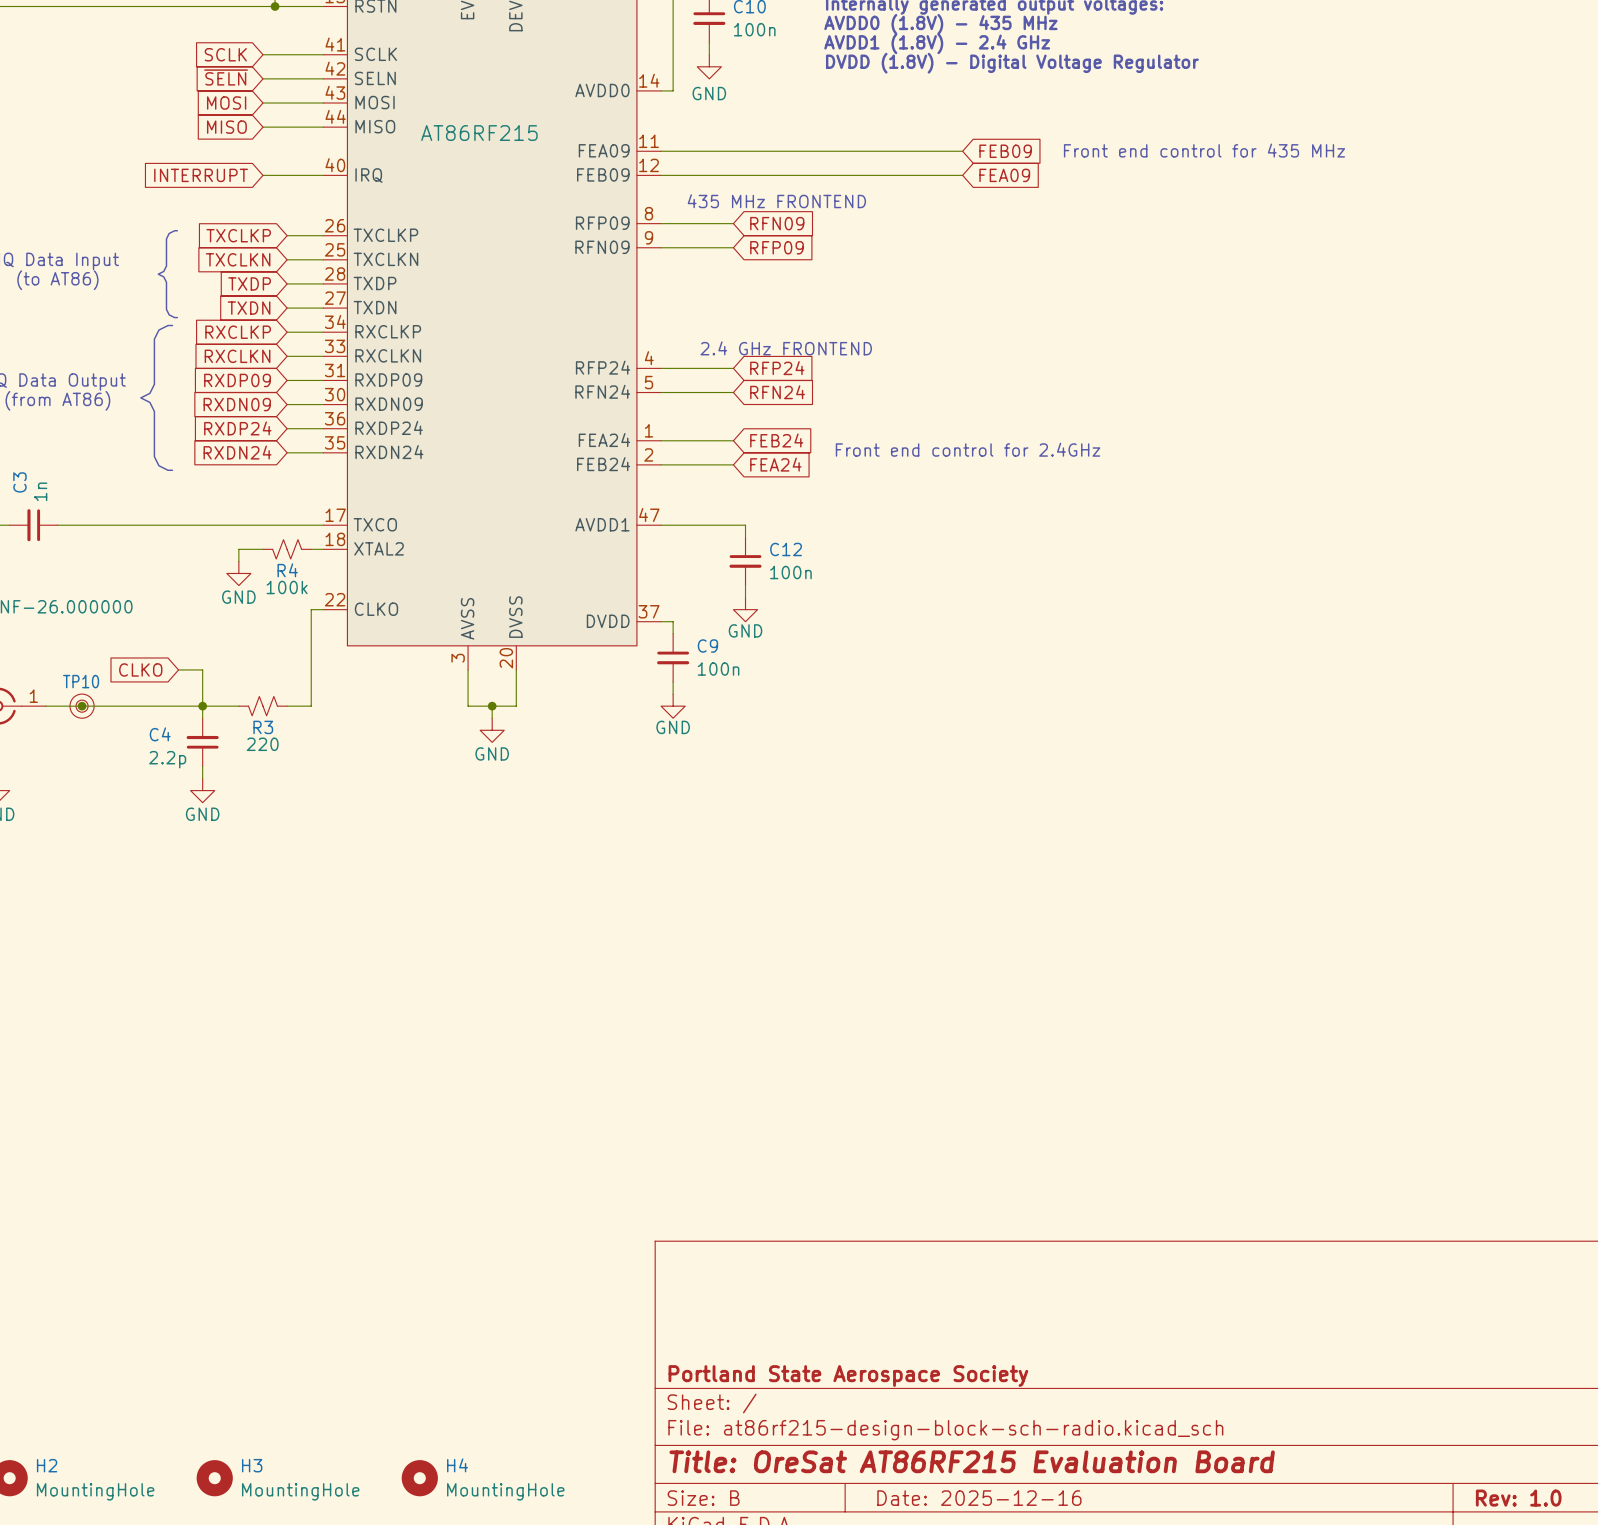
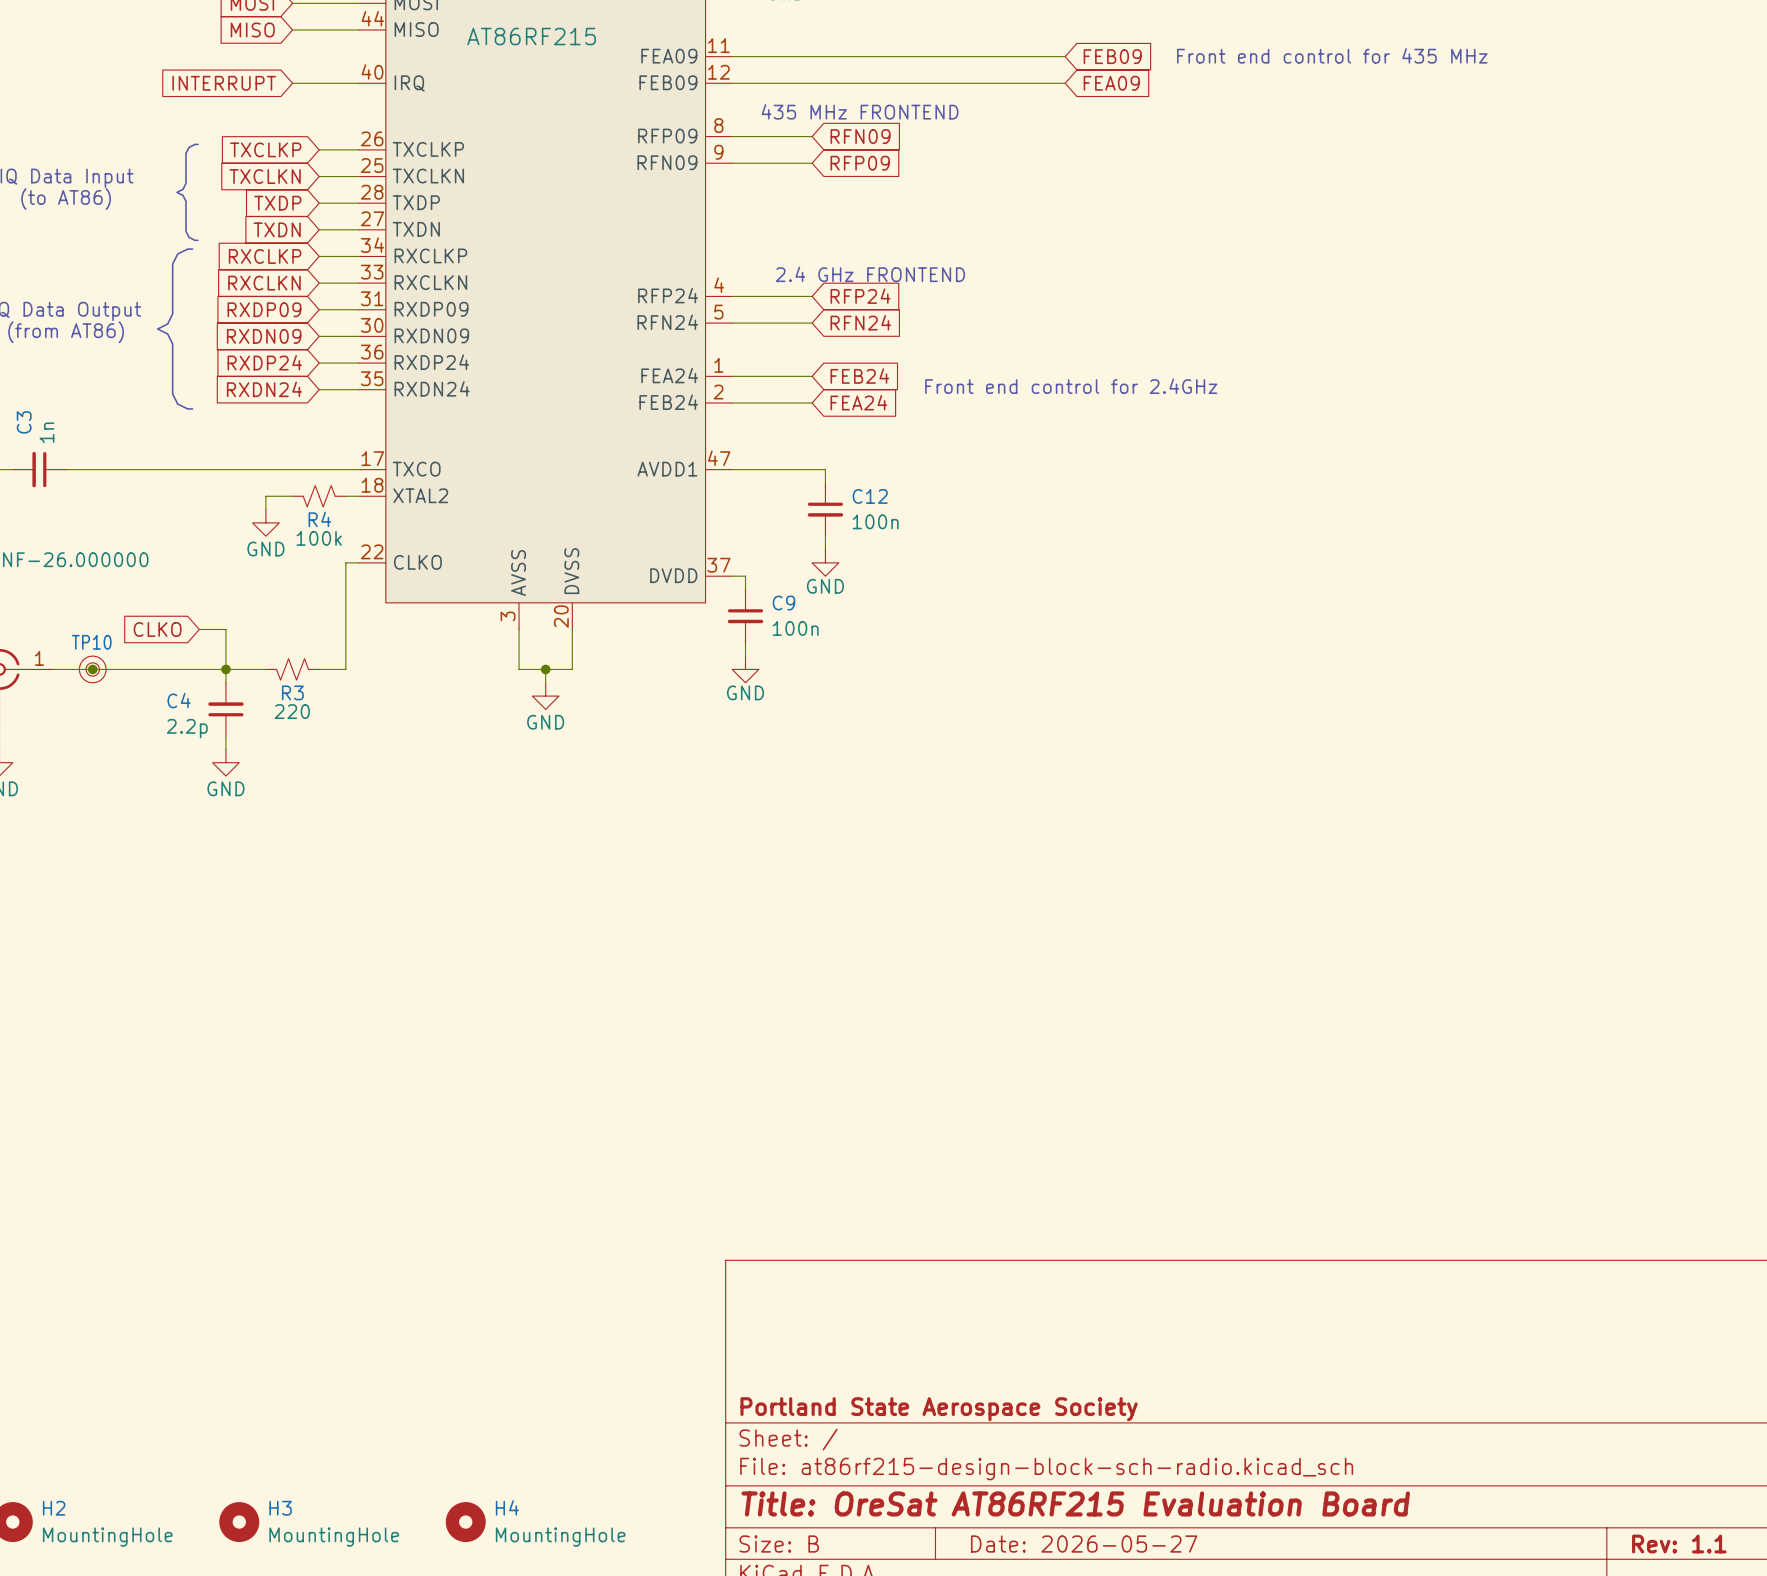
title block: Date: 2025-12-16 (979, 1498) -> Date: 2026-05-27 (1084, 1544)
title block: Rev: 1.0 (1518, 1498) -> Rev: 1.1 (1679, 1544)

